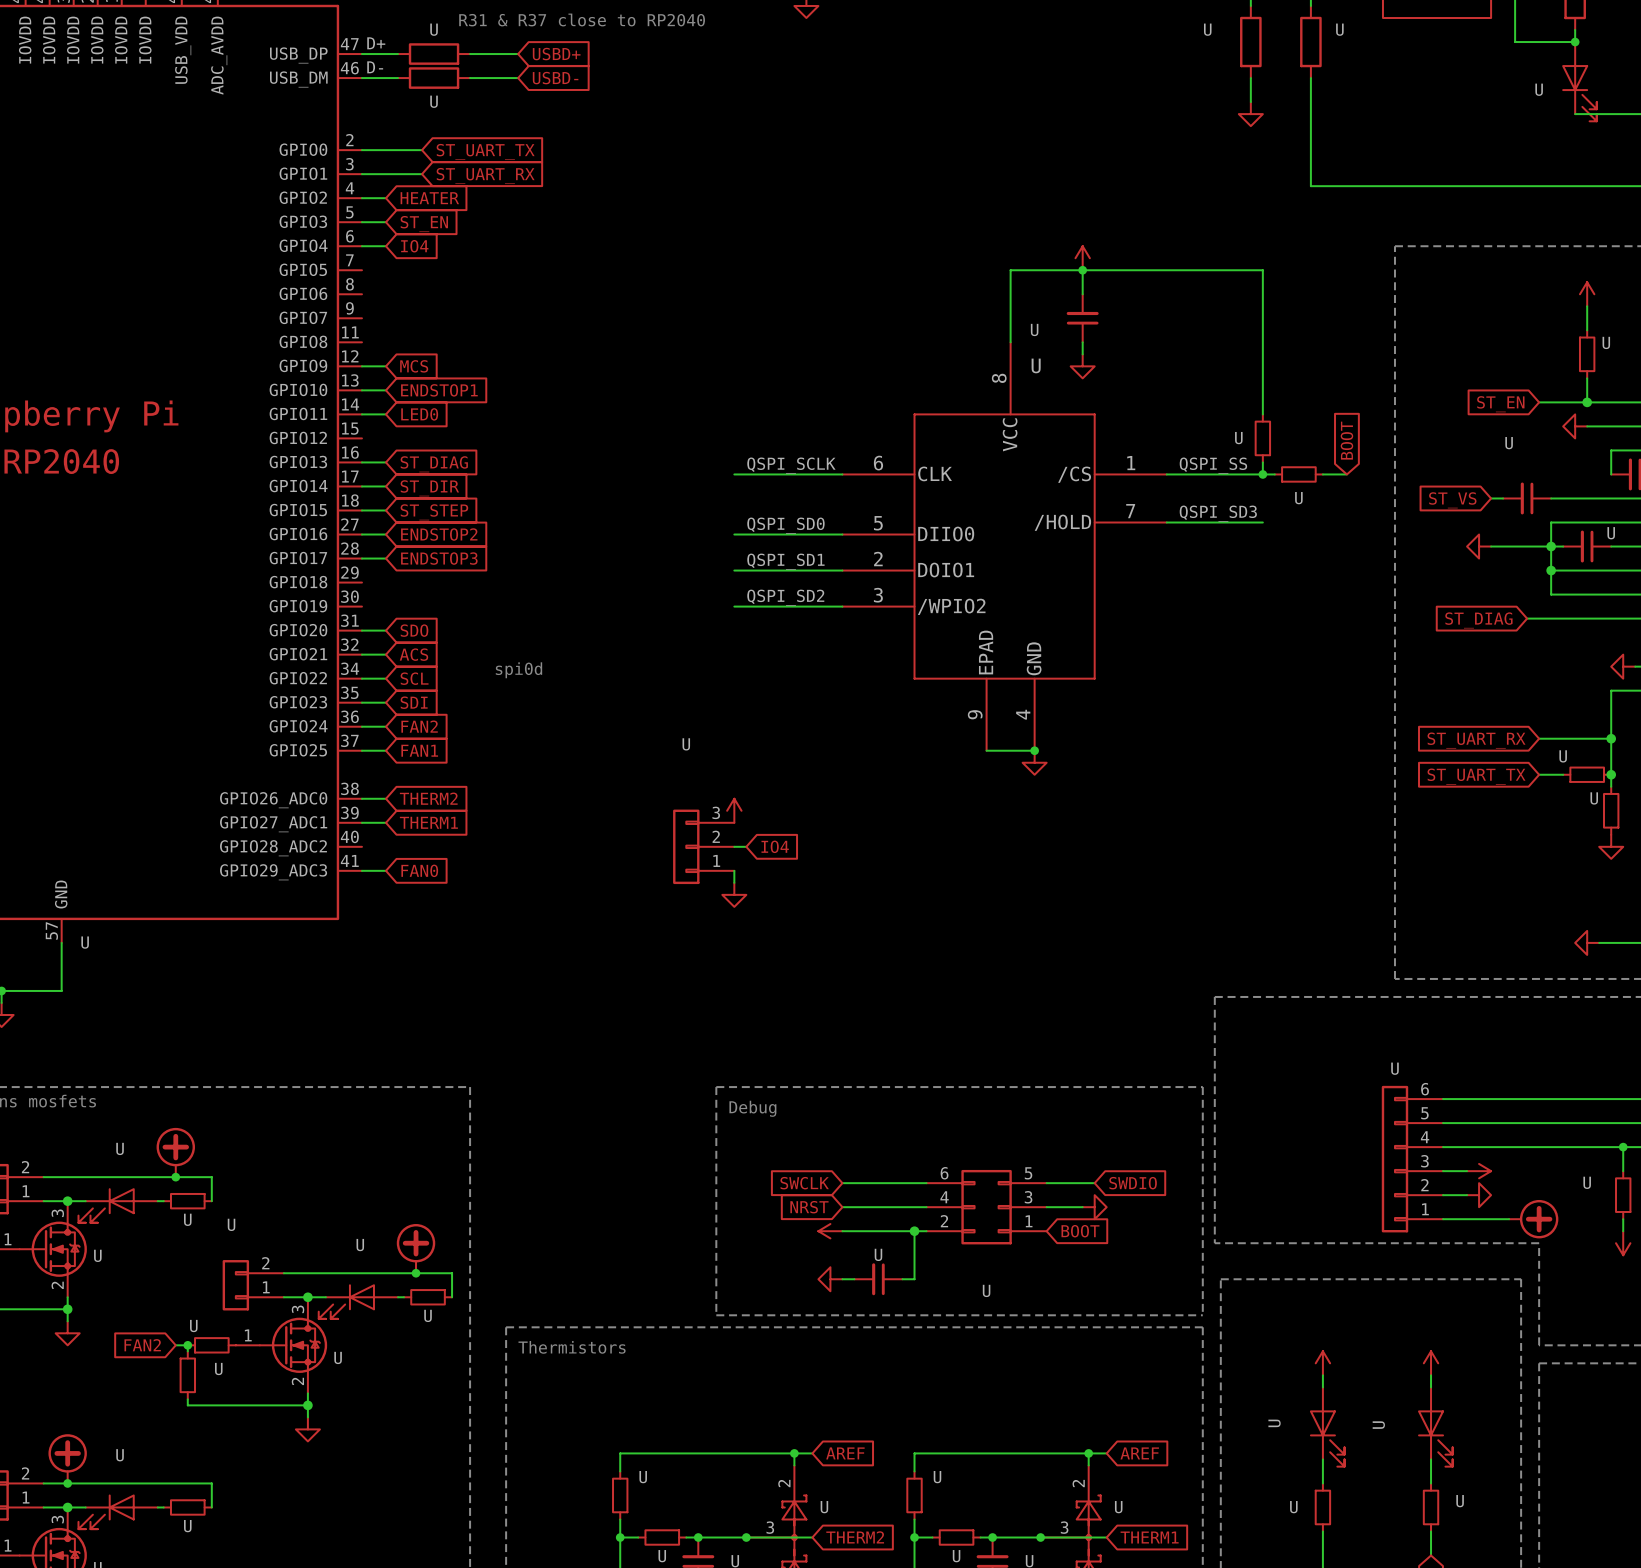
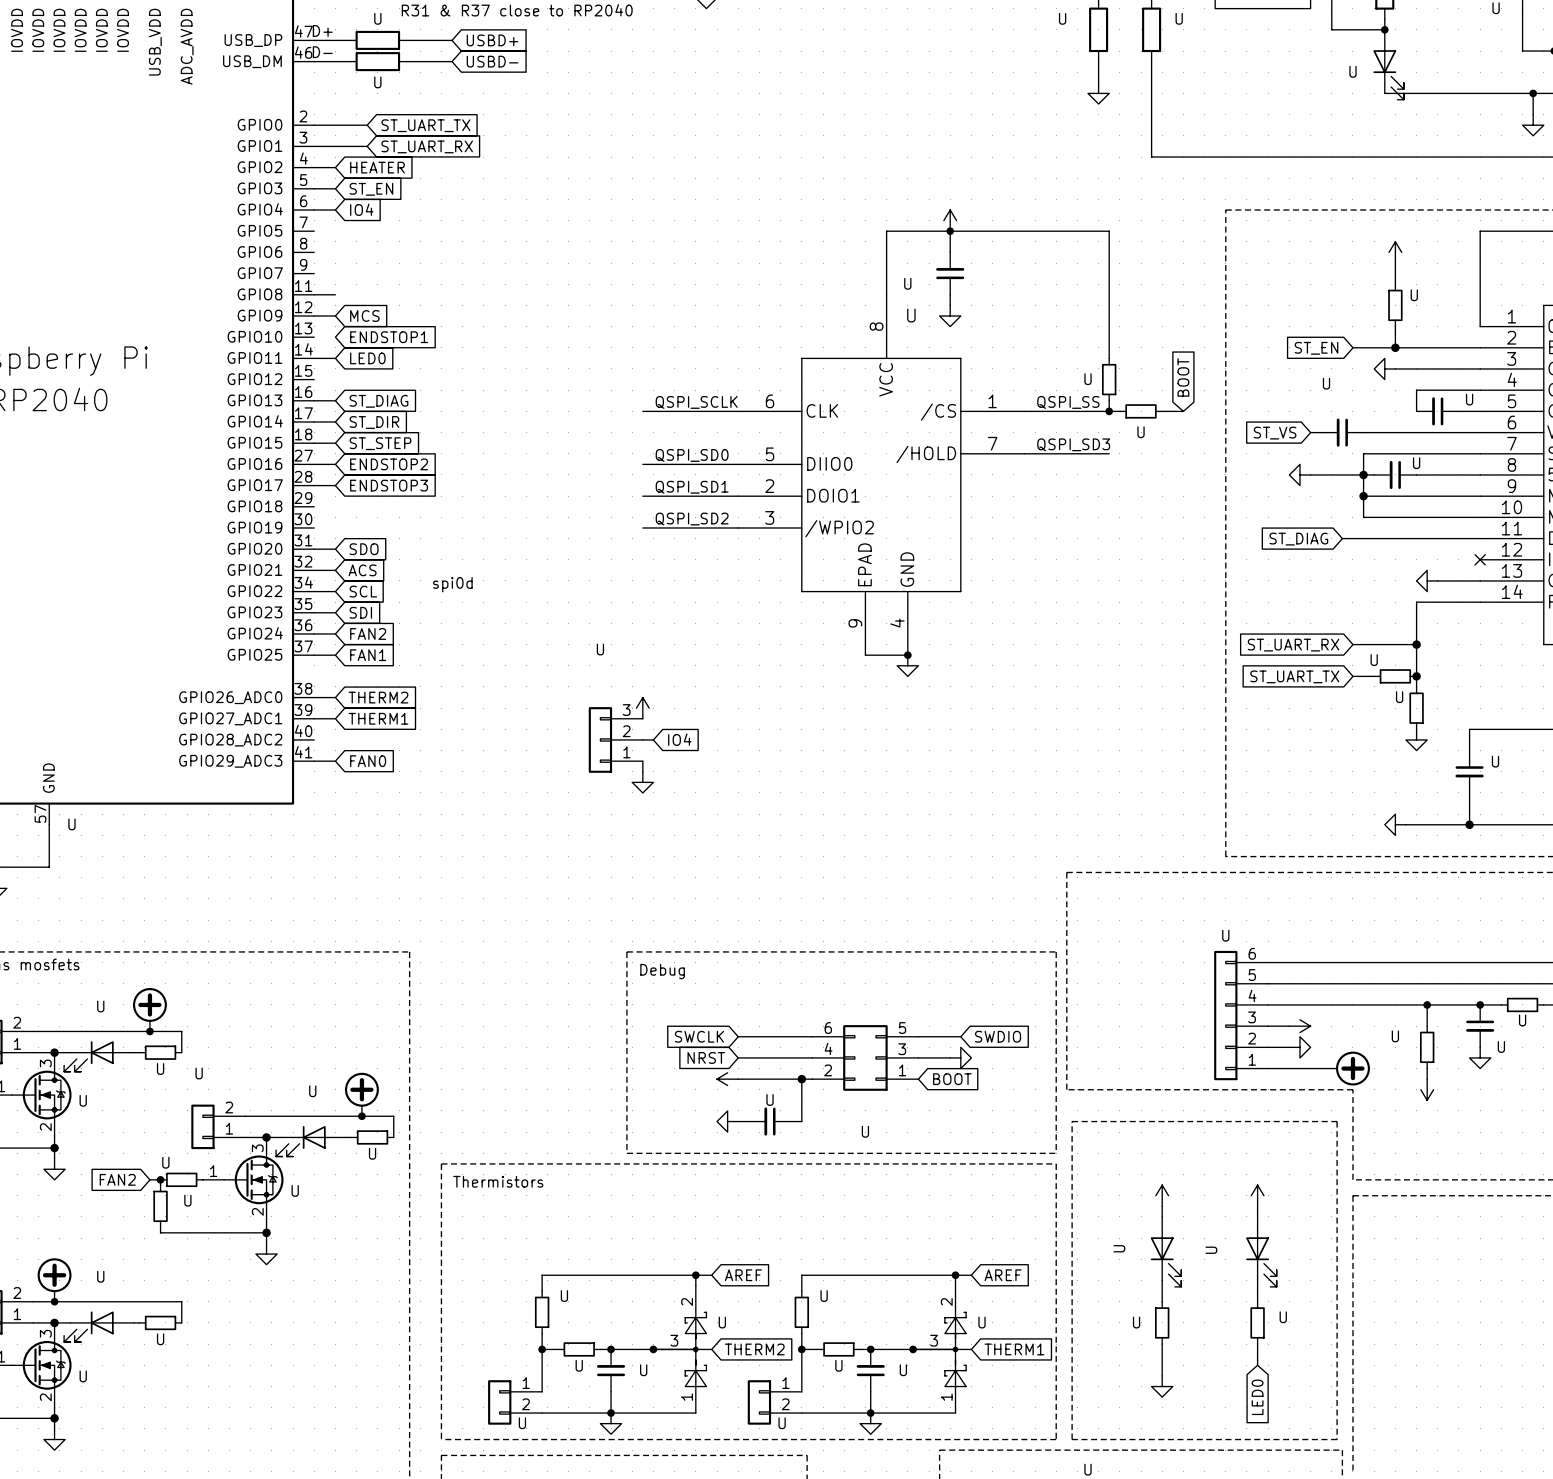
wire: (361, 390) (385, 390) -> (314, 294) (335, 294)

